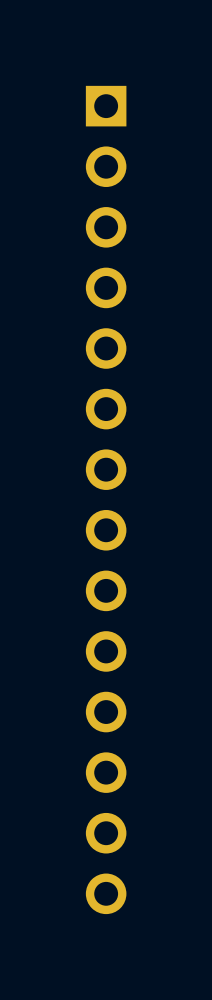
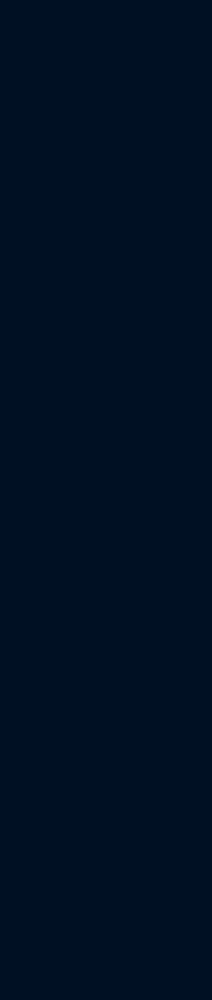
part: (106, 499) -> none

